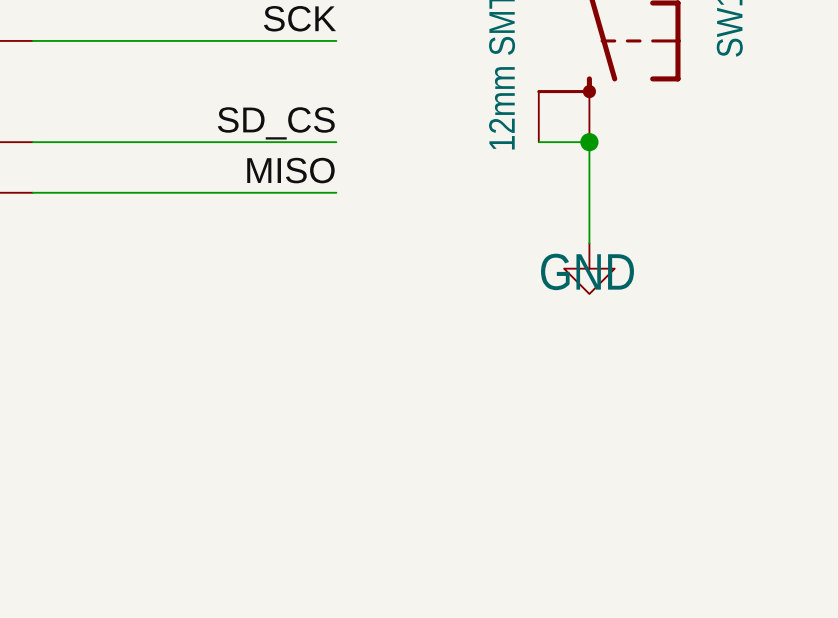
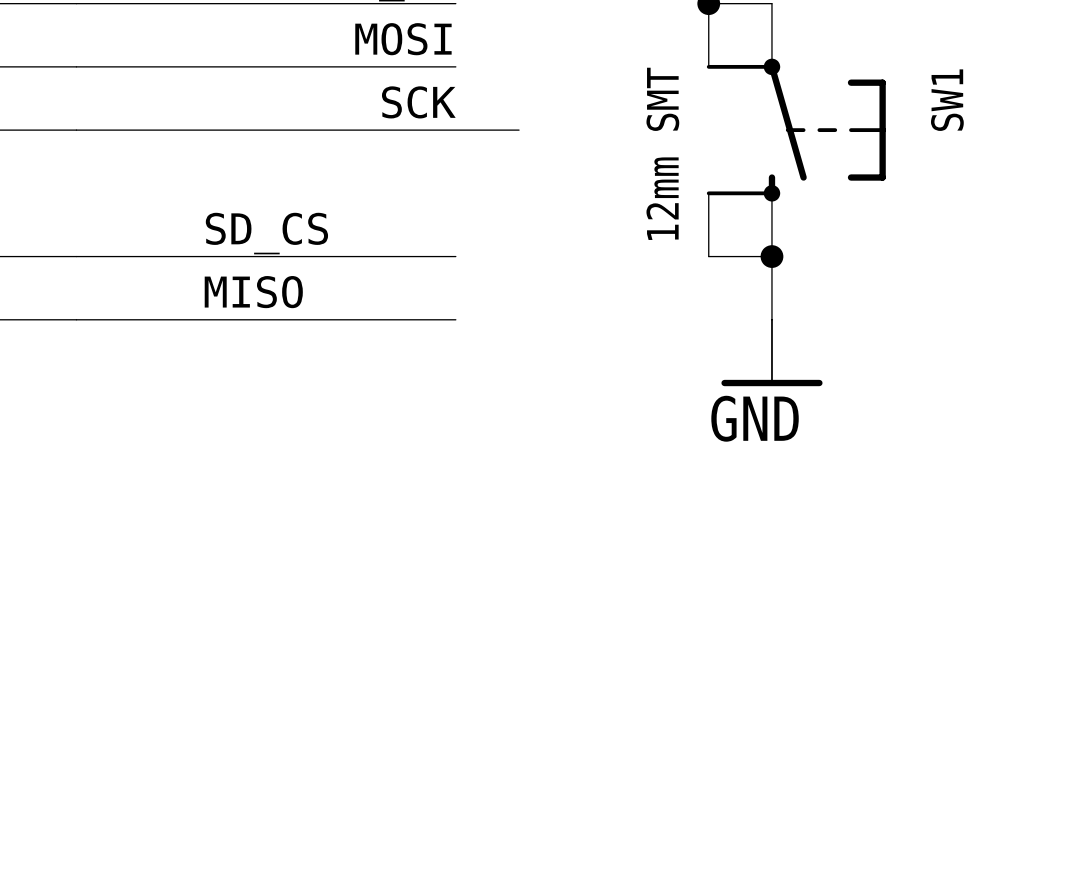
wire: none -> (455, 130) (519, 130)
label position: SD_CS (276, 123) -> SD_CS (266, 233)
label position: MISO (290, 170) -> MISO (253, 292)
power symbol: none -> GND (771, 352)
power symbol: GND (589, 268) -> none

